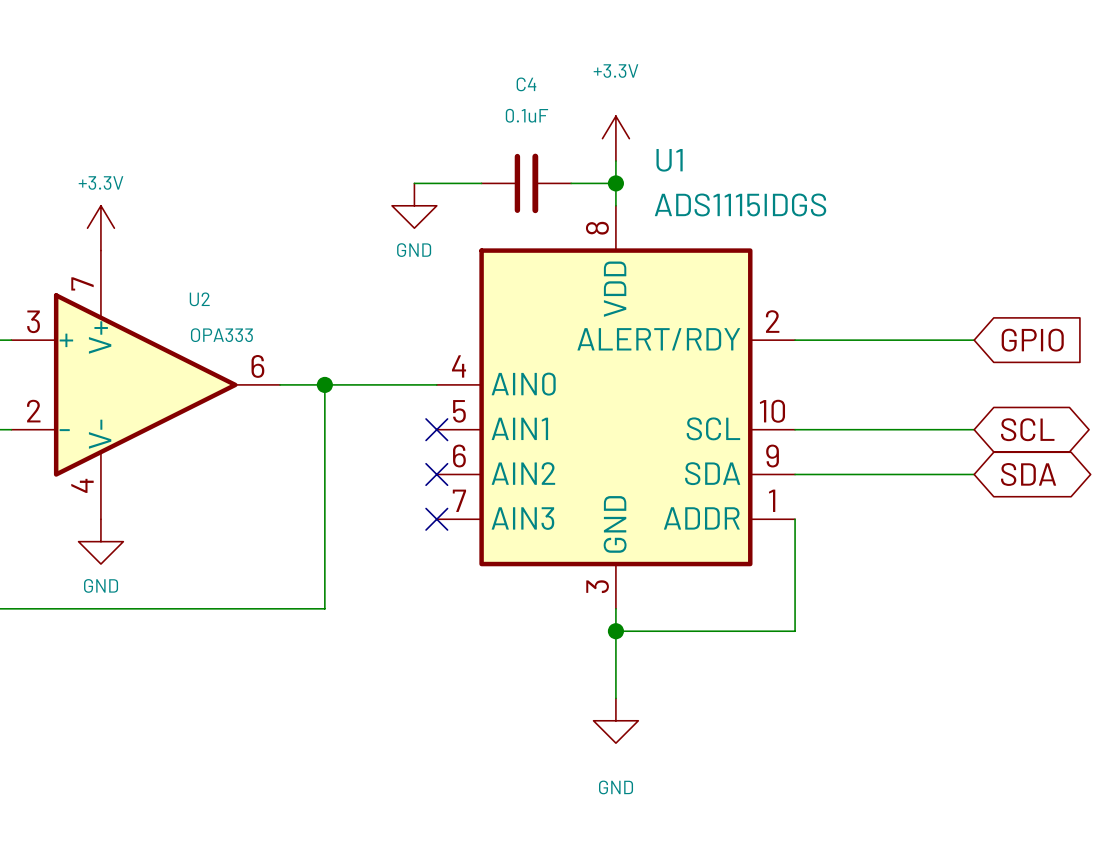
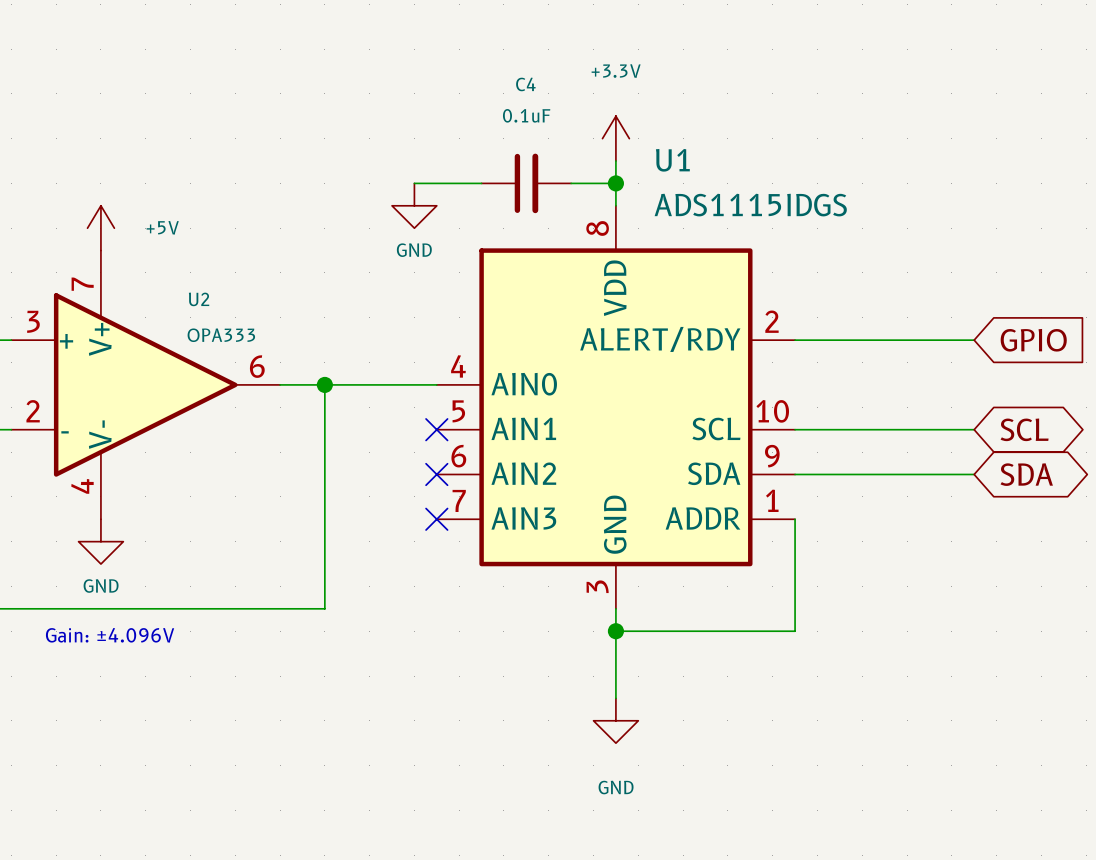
power symbol: +3.3V (100, 228) -> +5V (100, 228)
text: none -> Gain: ±4.096V (110, 635)

